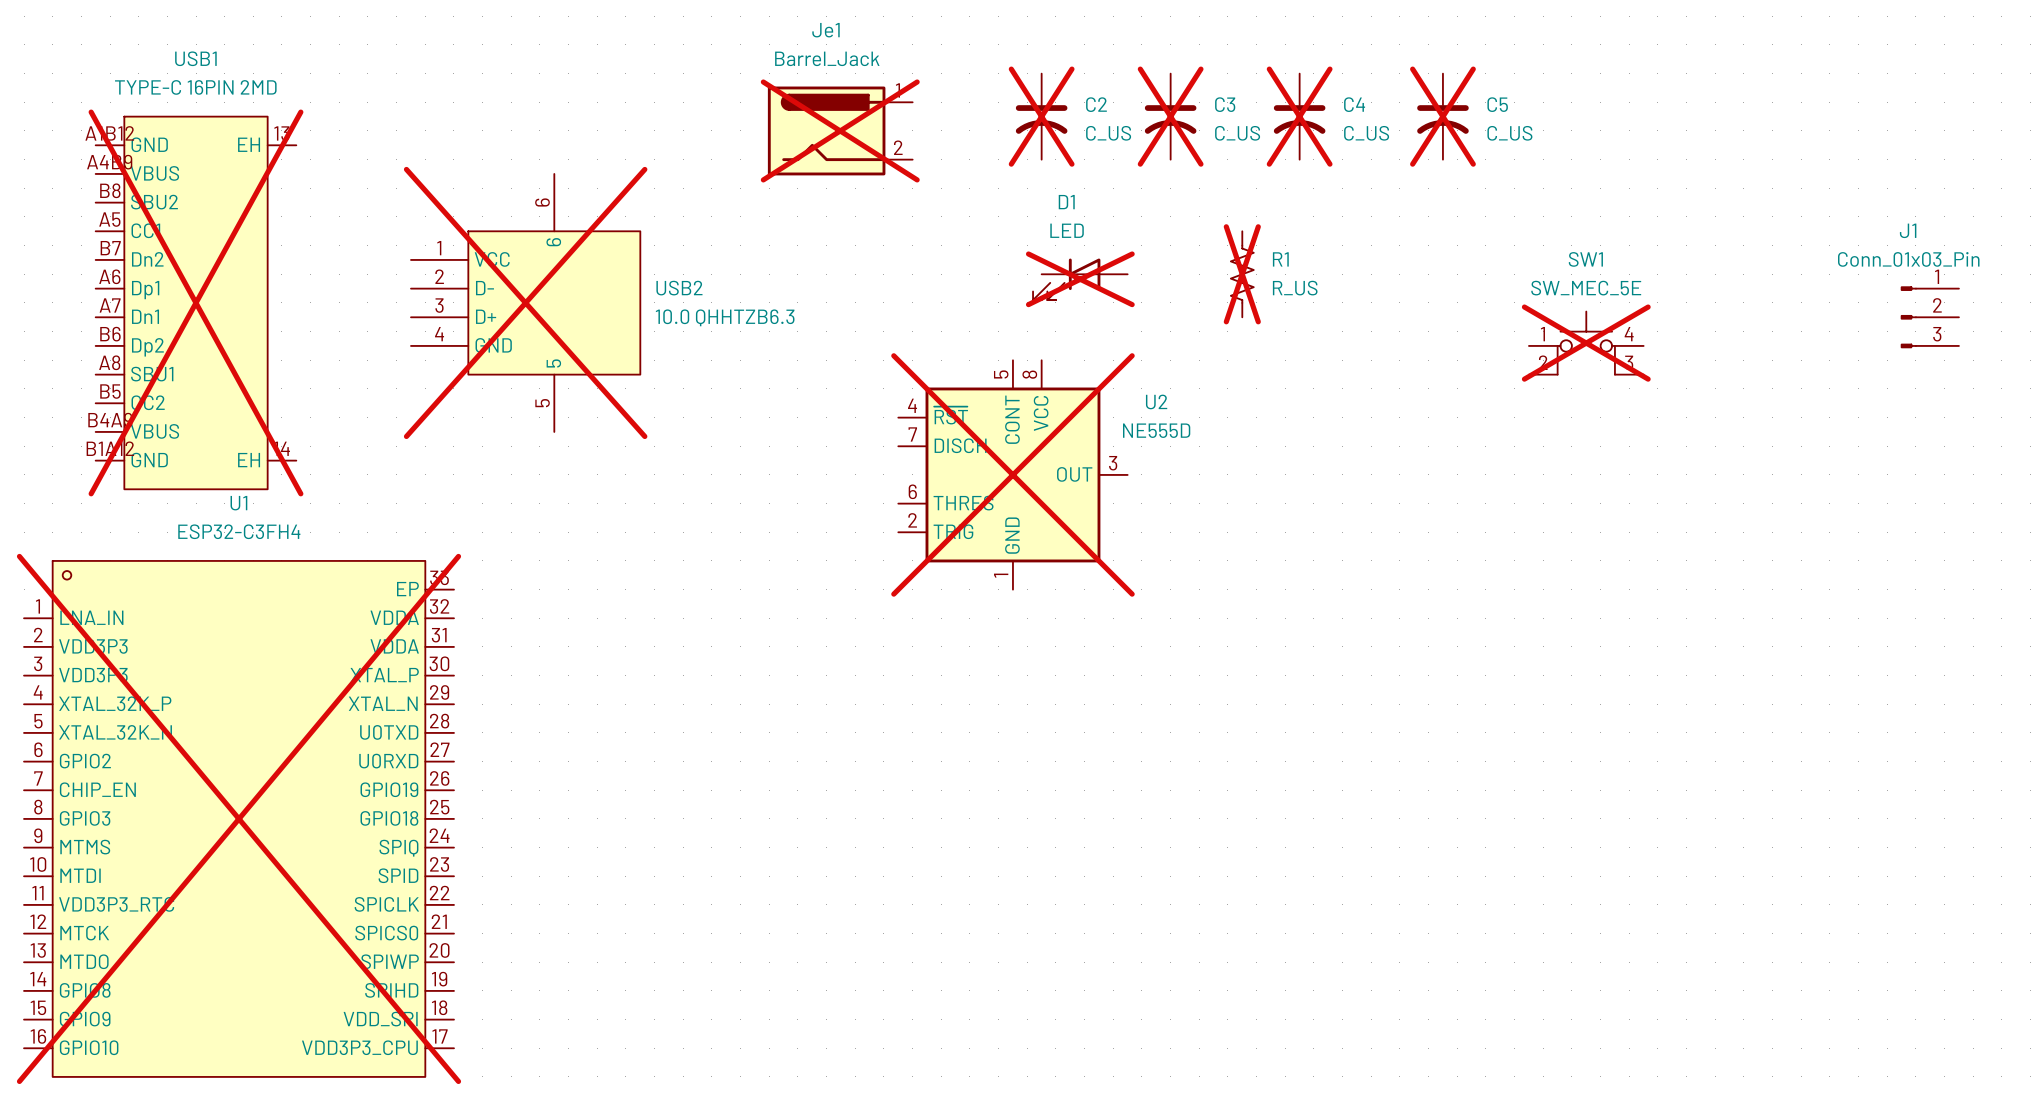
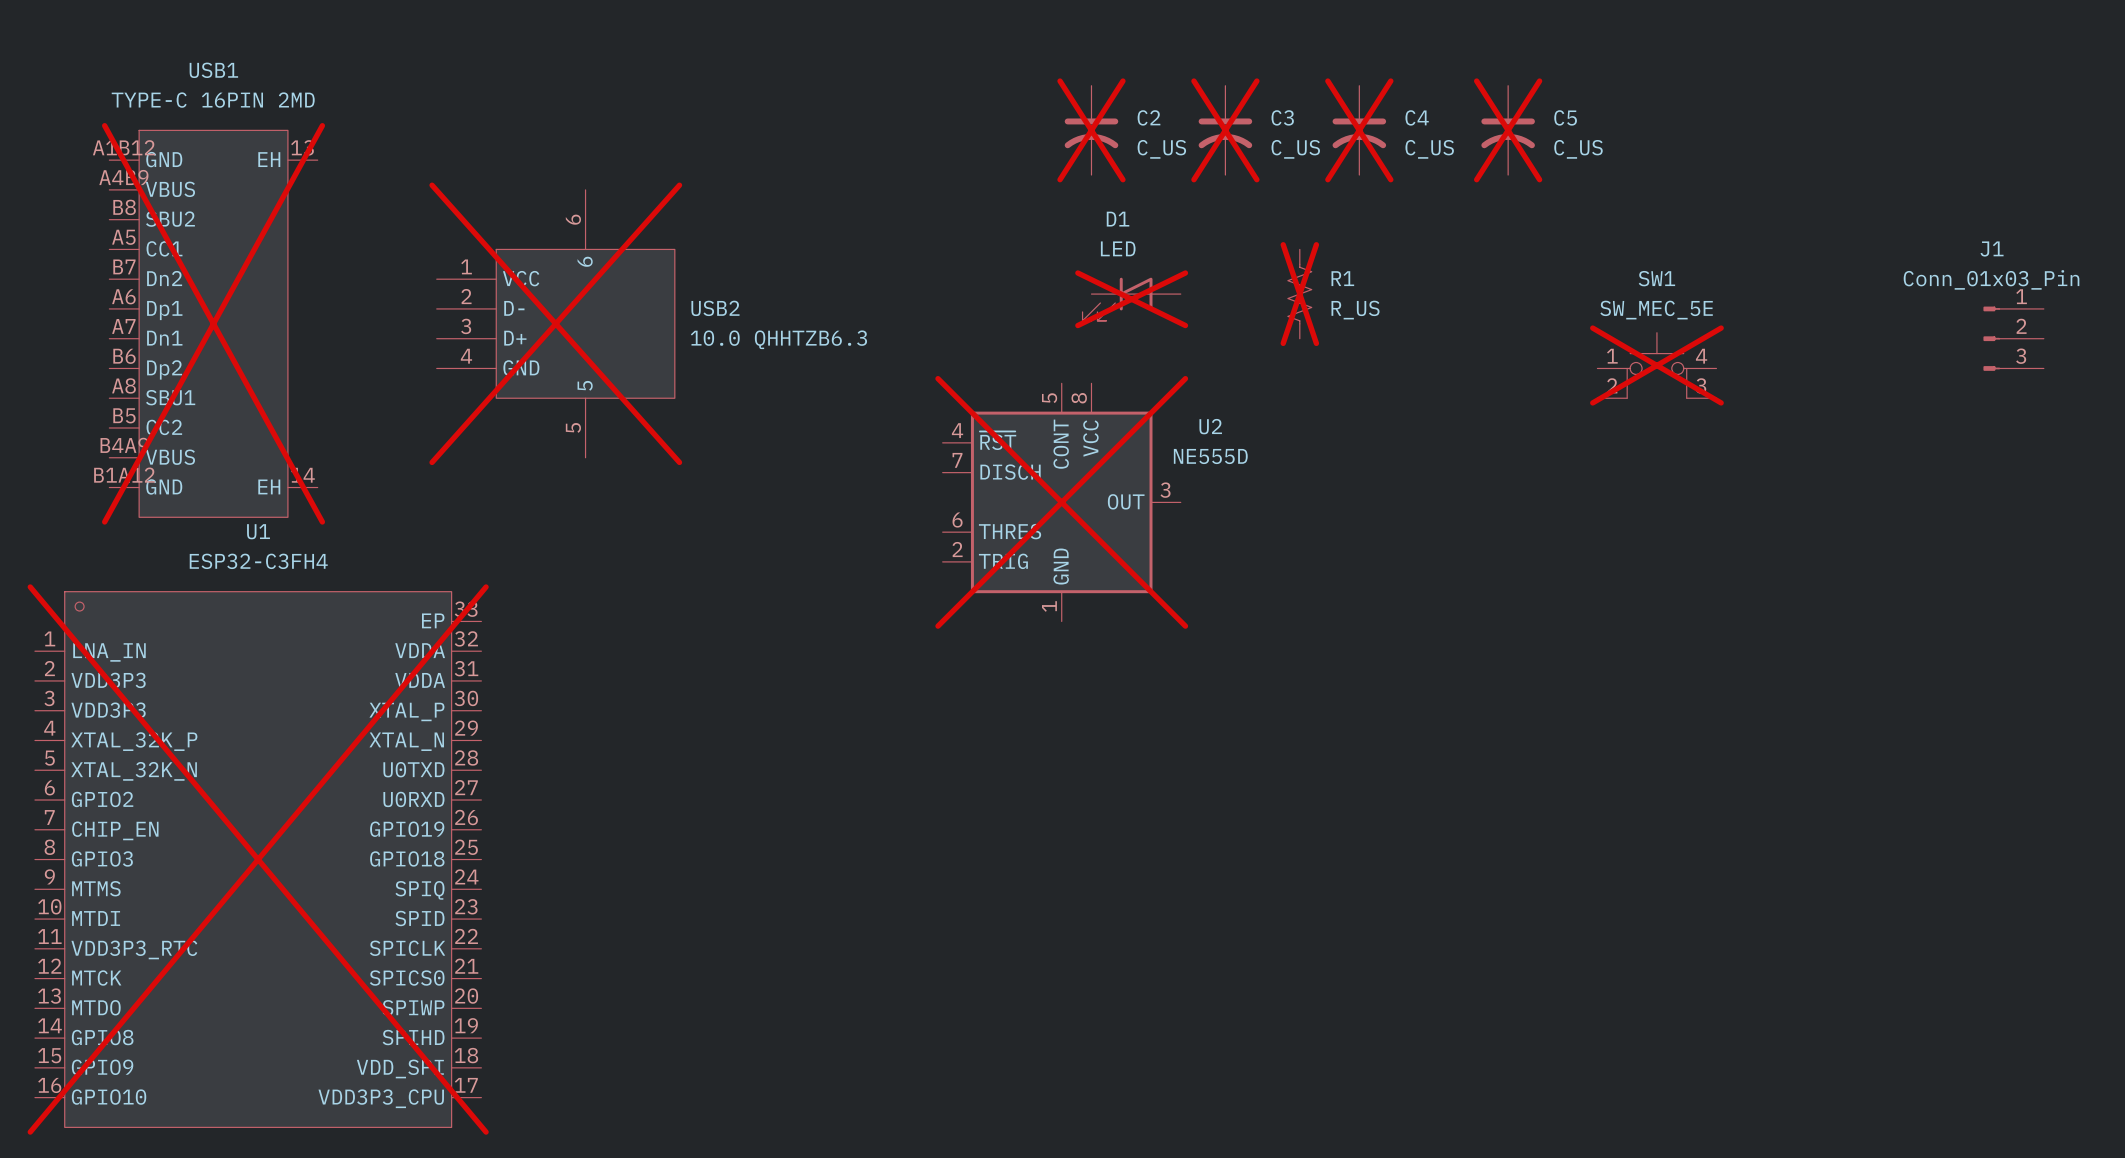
Je1: Barrel_Jack (840, 130) -> none

